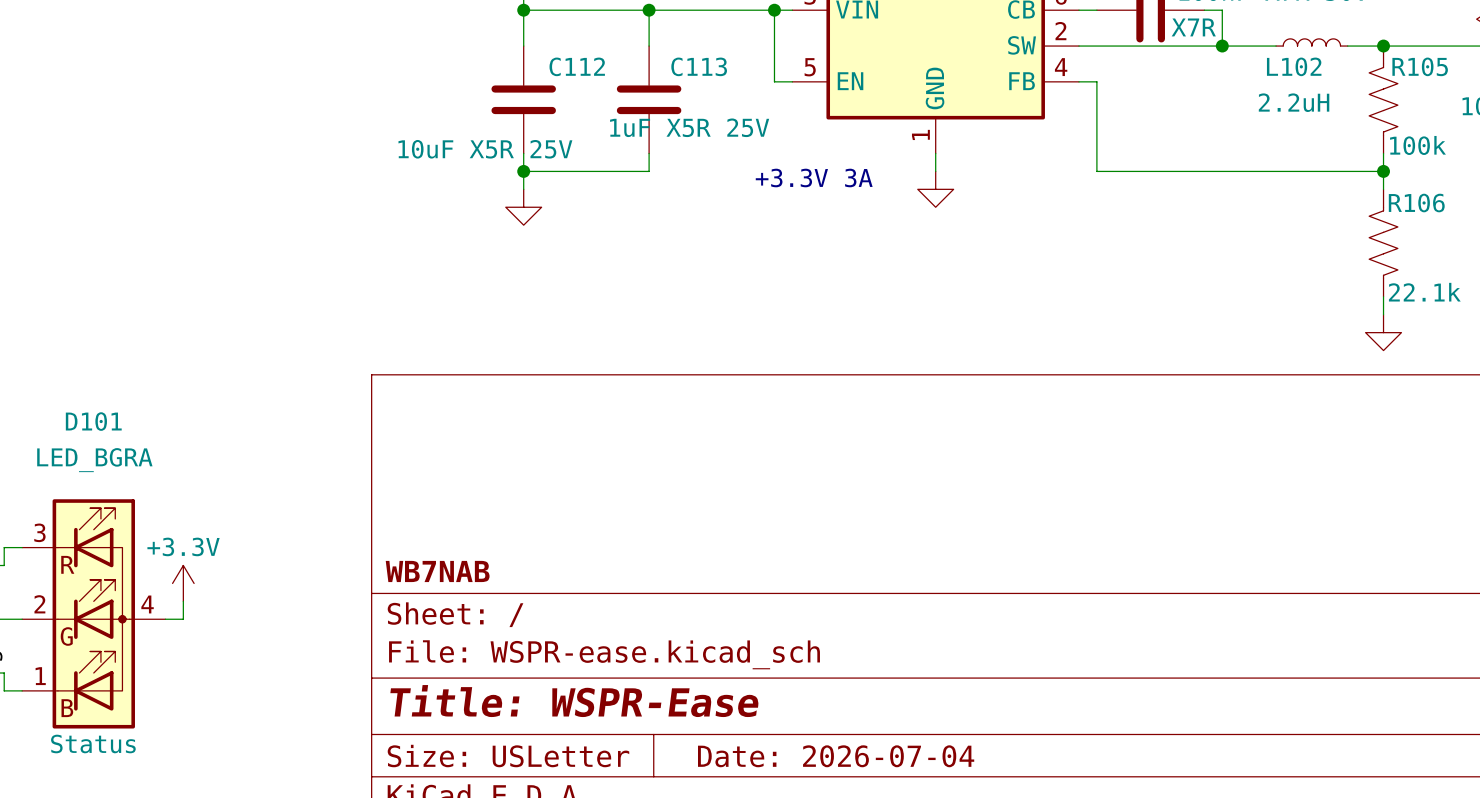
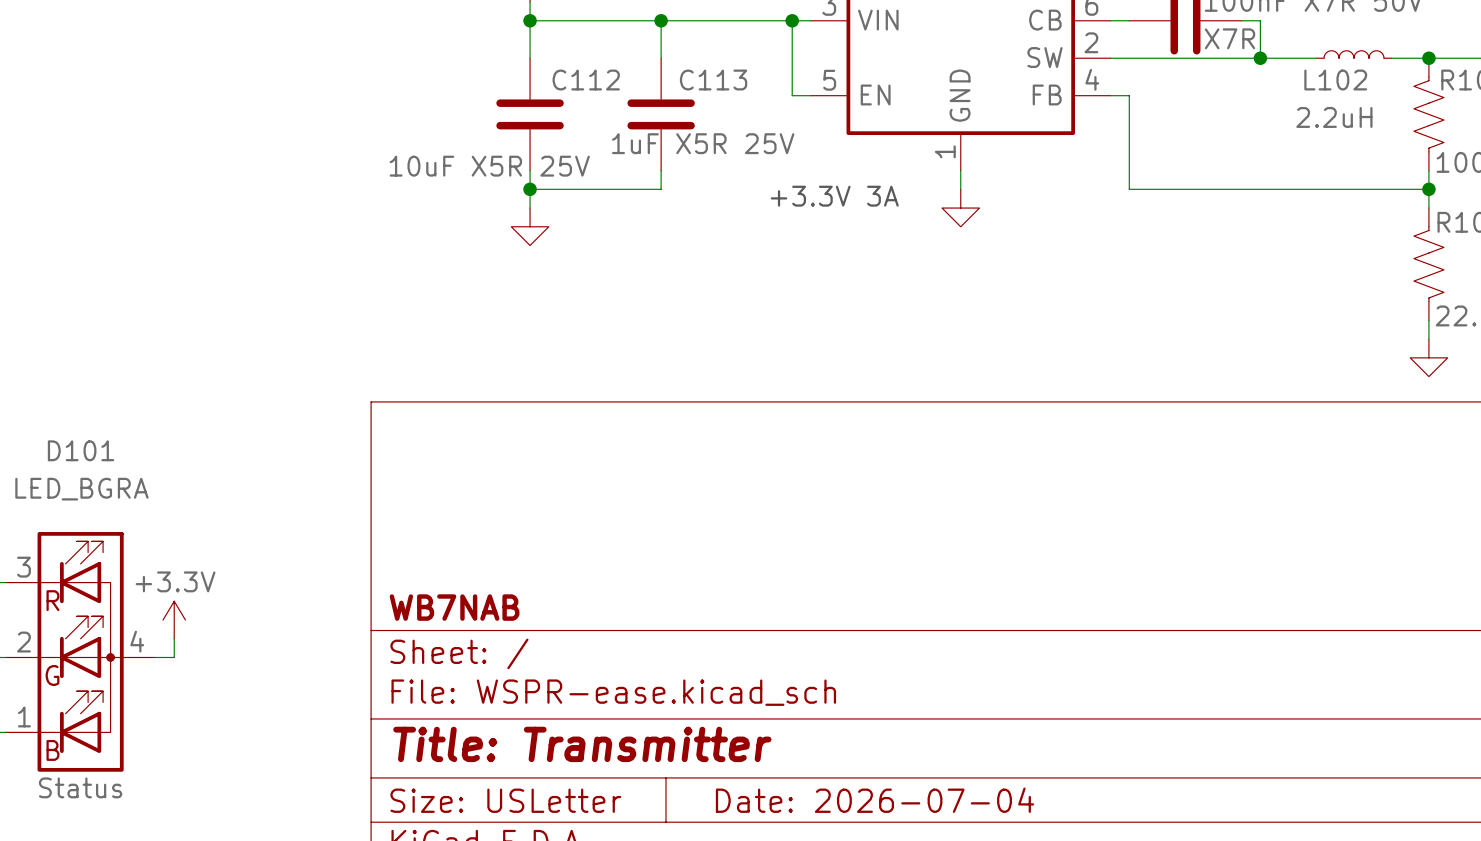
title block: Title: WSPR-Ease (574, 701) -> Title: Transmitter (582, 744)

